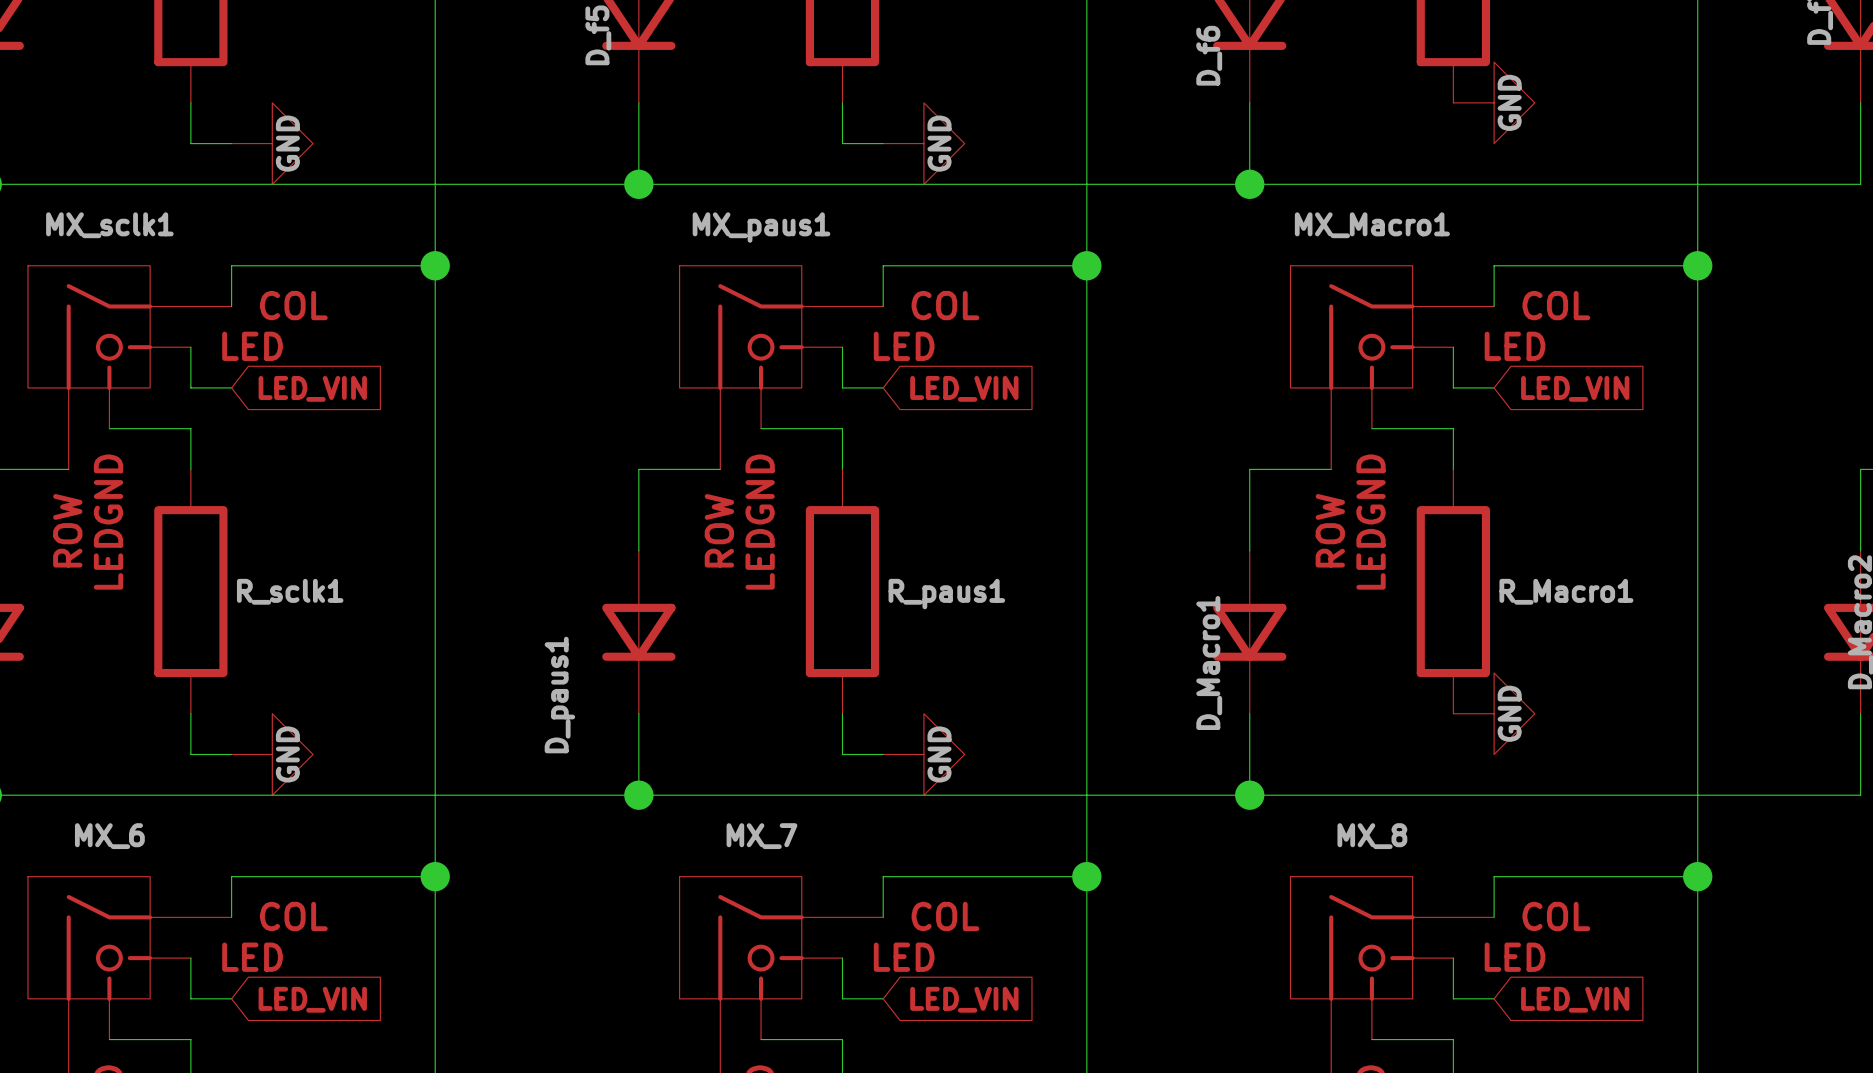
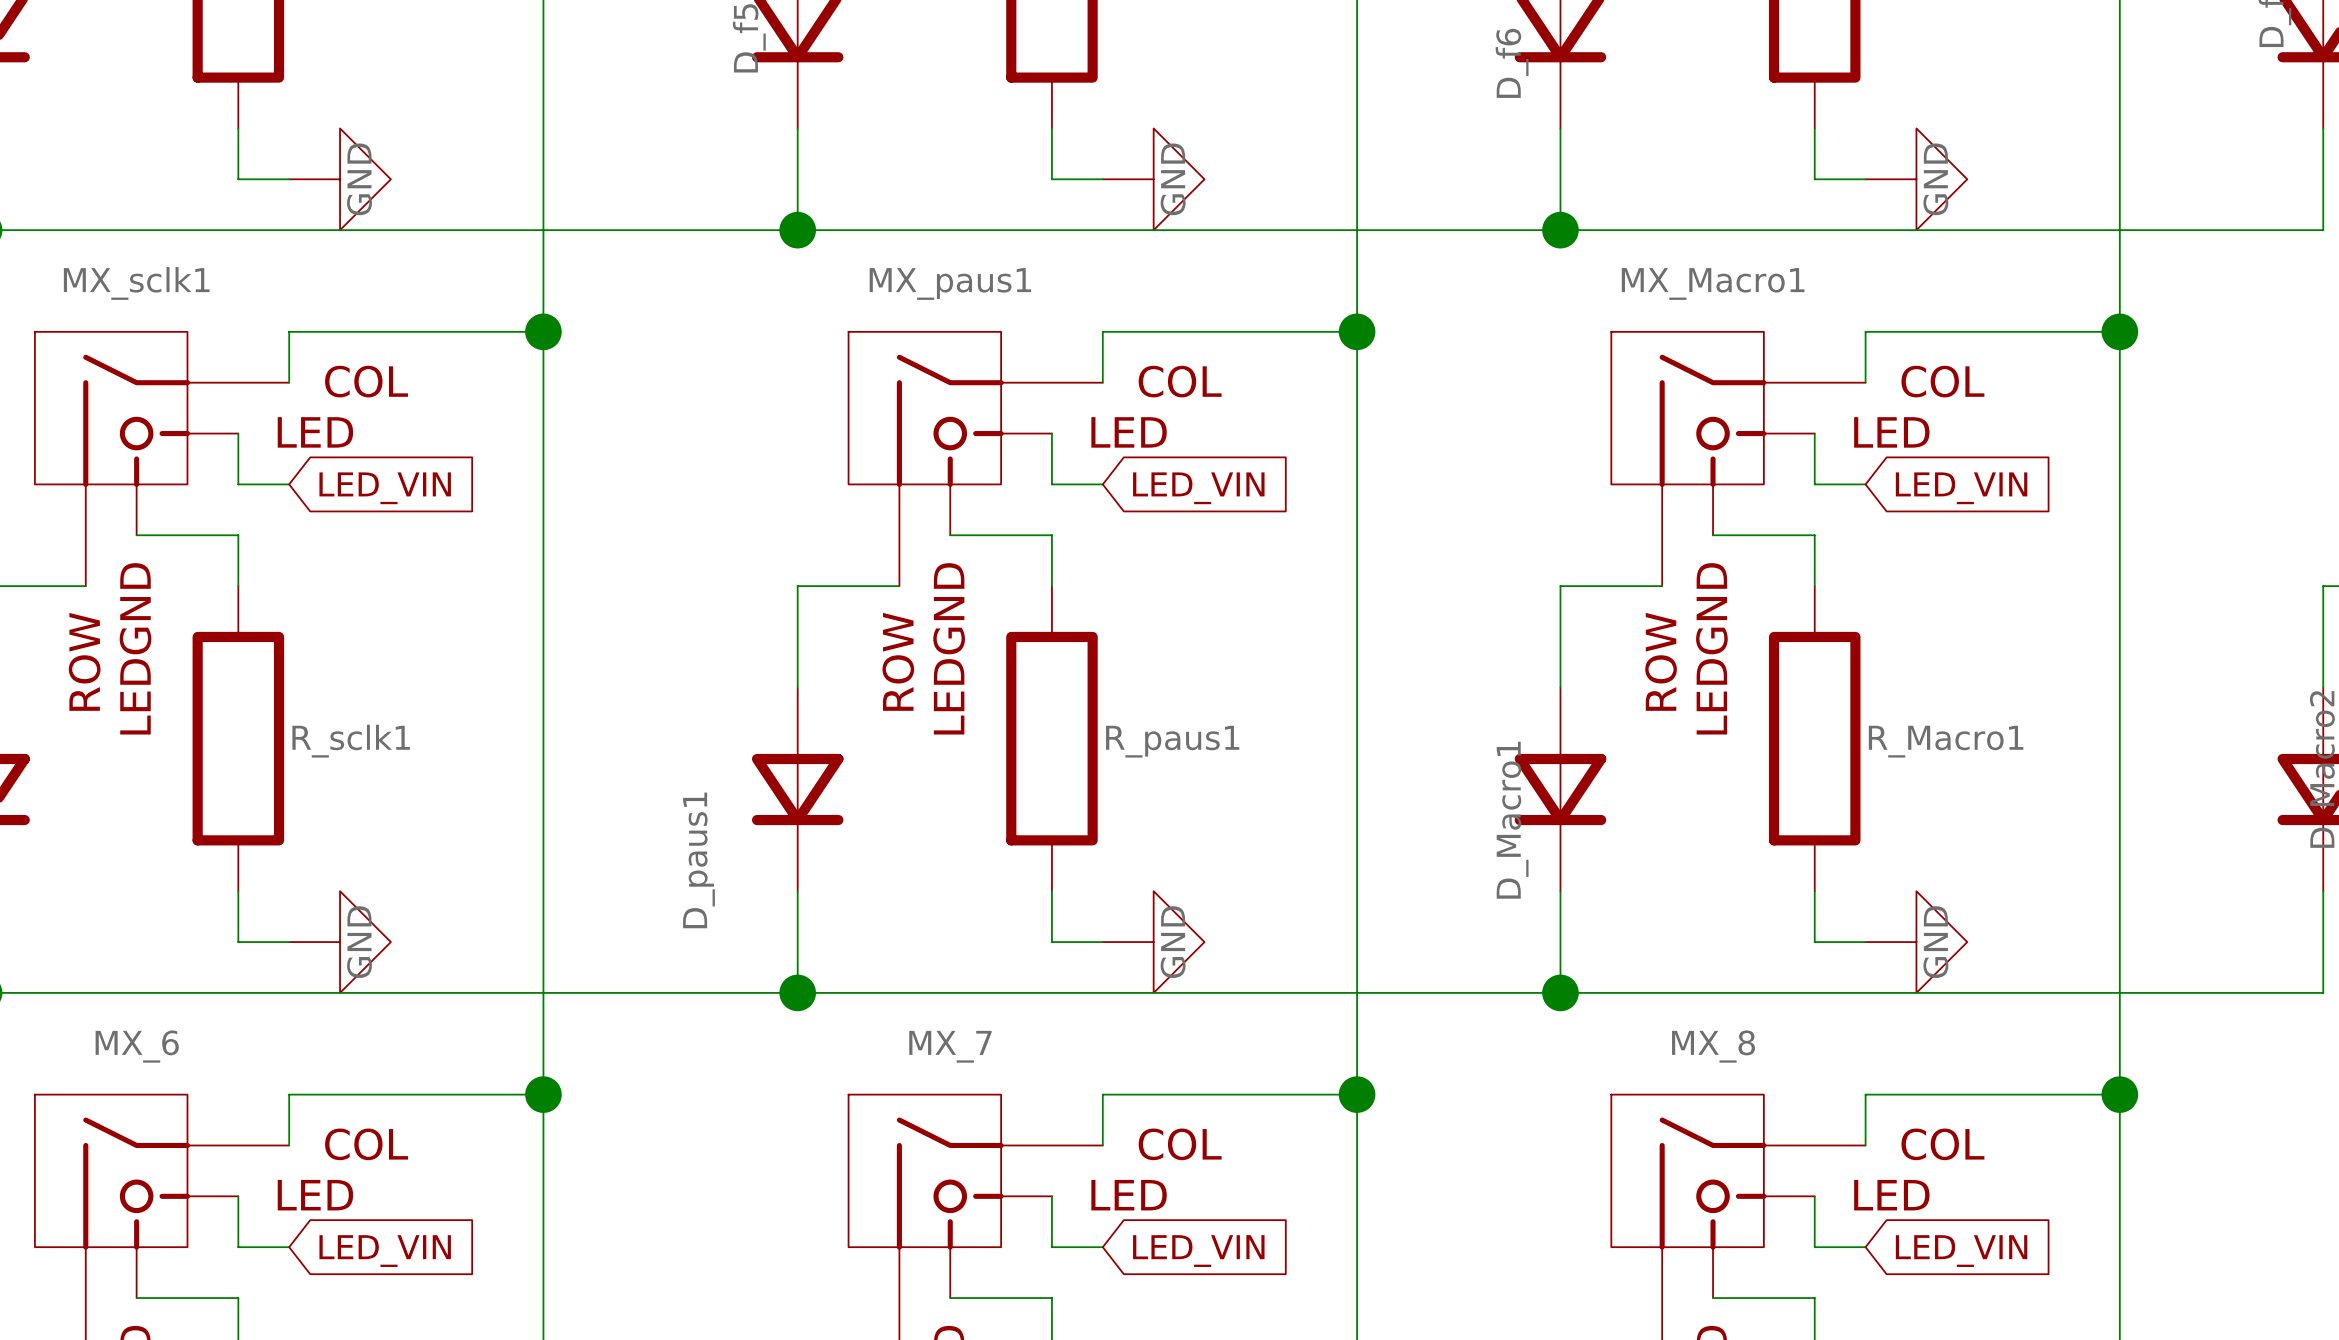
wire: none -> (1814, 128) (1814, 179) (1865, 179)
power symbol position: GND (1494, 102) -> GND (1916, 179)
wire: none -> (1814, 891) (1814, 942) (1865, 942)
power symbol position: GND (1494, 713) -> GND (1916, 942)

